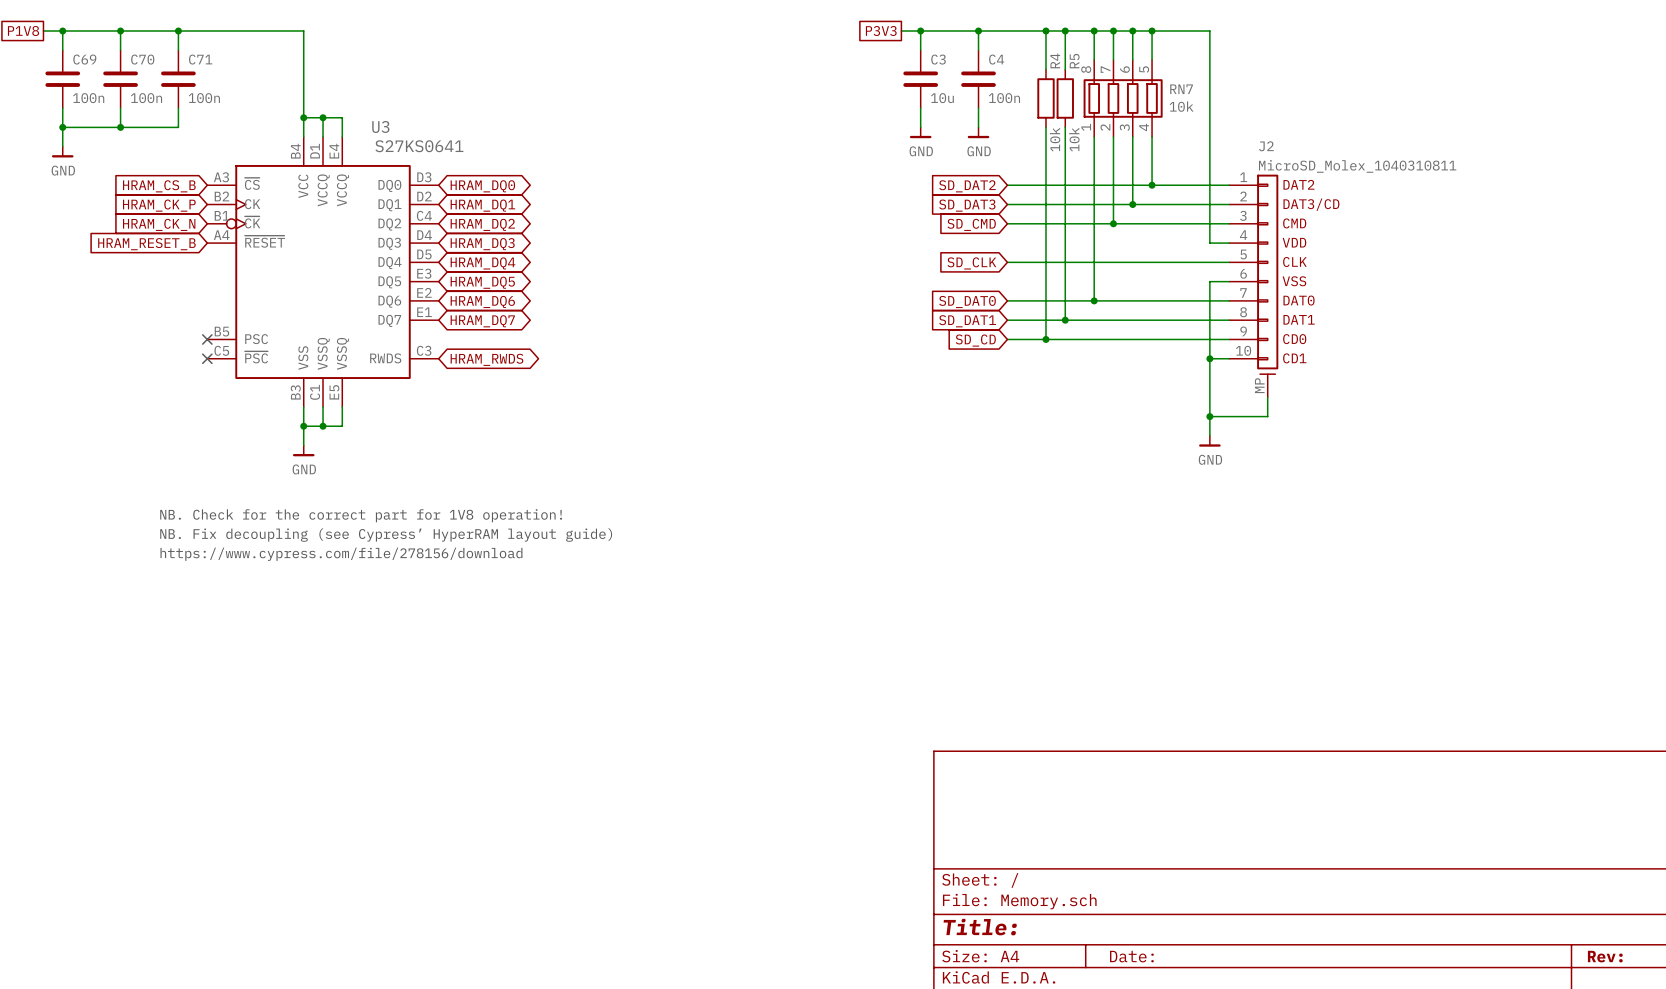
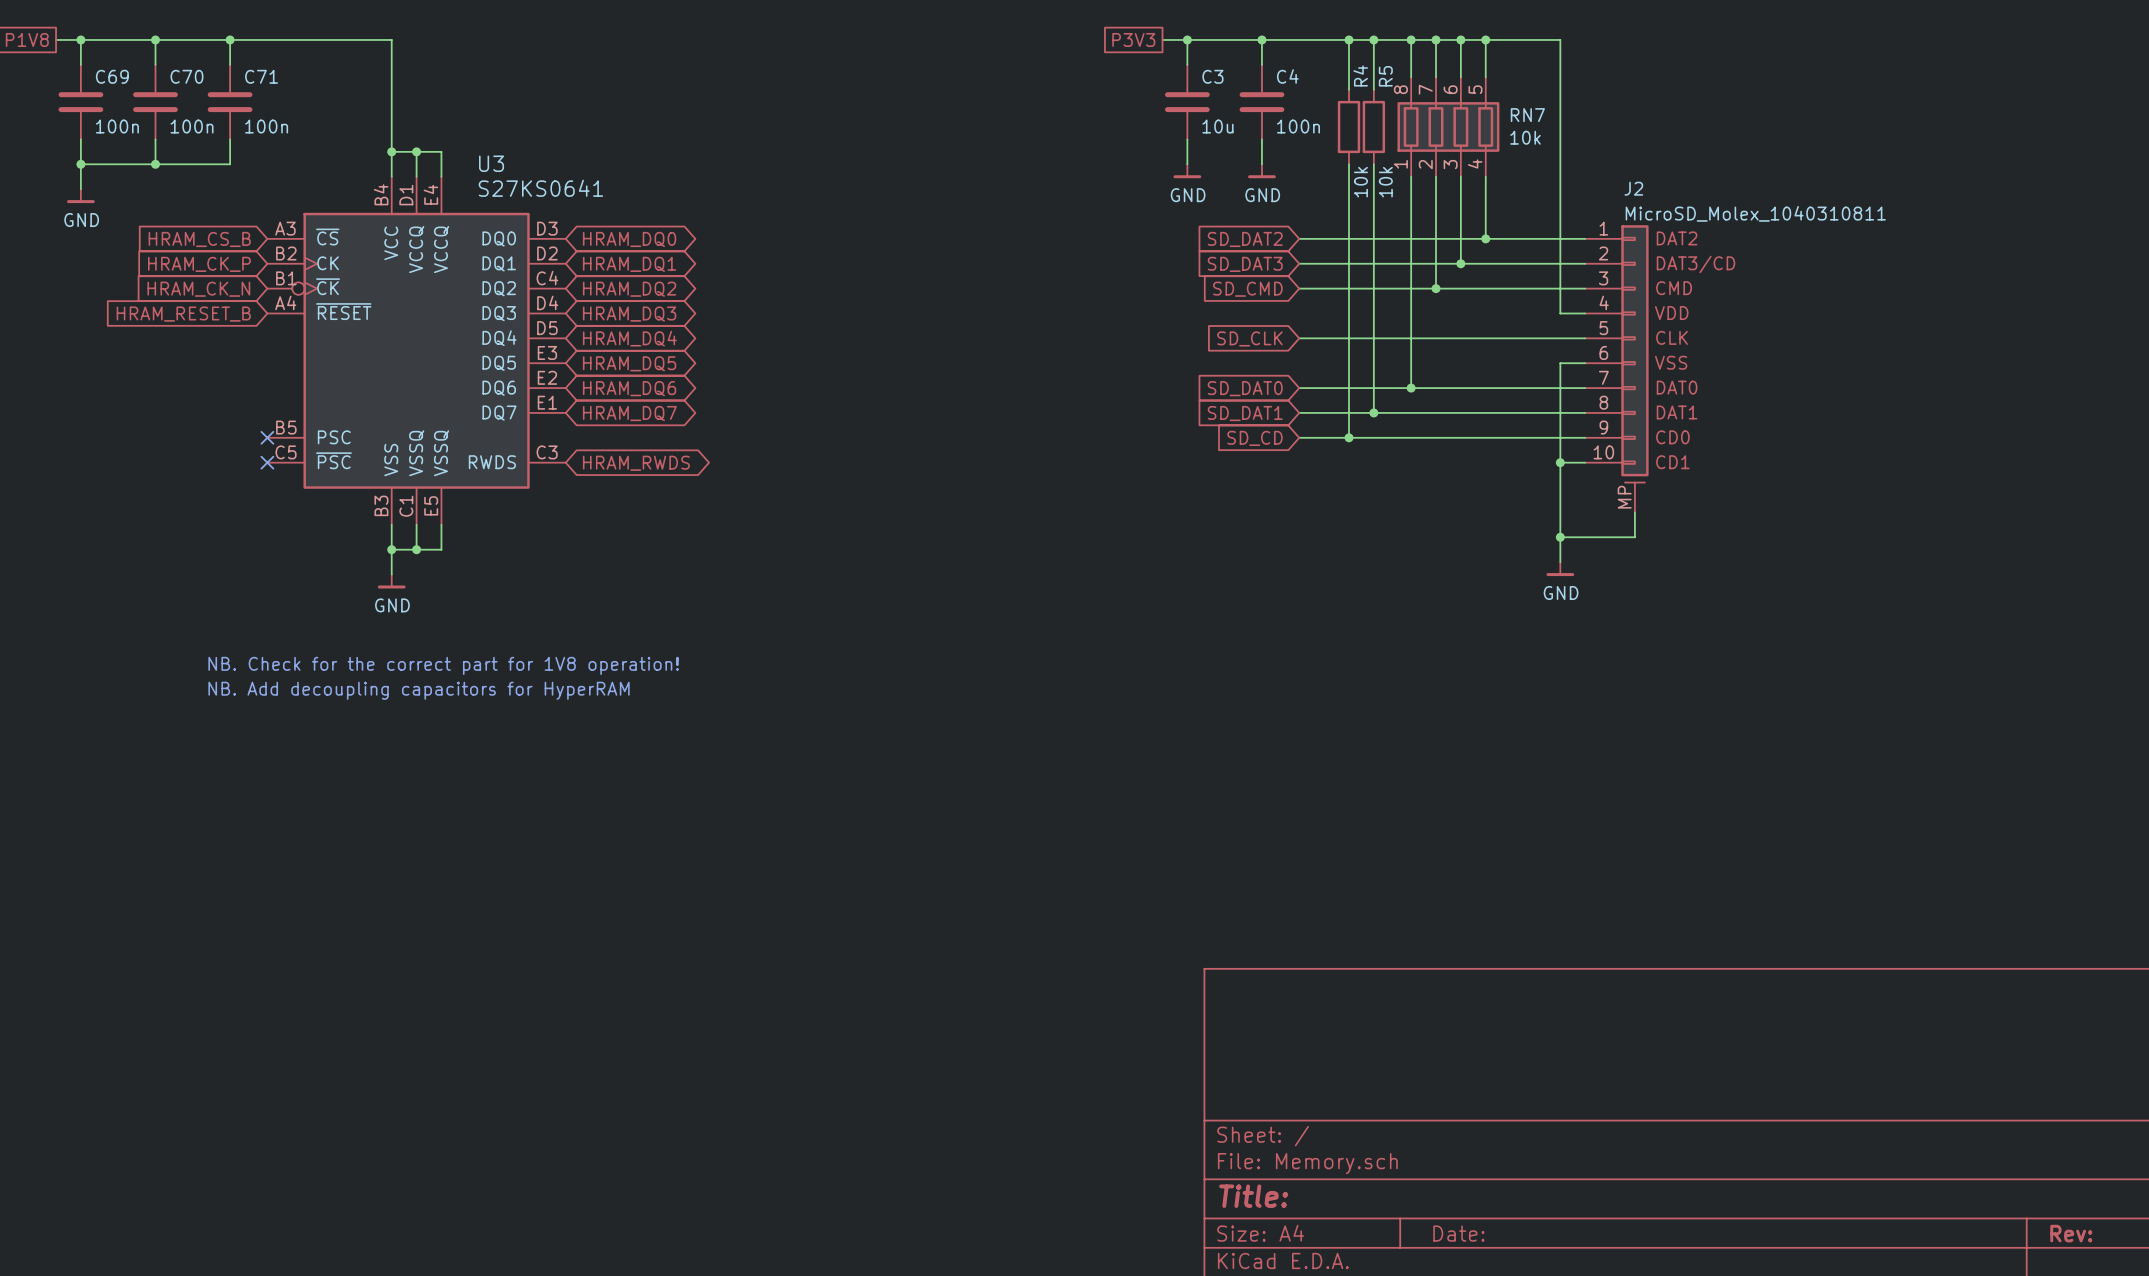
text: NB. Fix decoupling (see Cypress’ HyperRAM layout guide) (386, 535) -> NB. Add decoupling capacitors for HyperRAM (419, 690)
text: https://www.cypress.com/file/278156/download (341, 554) -> none

